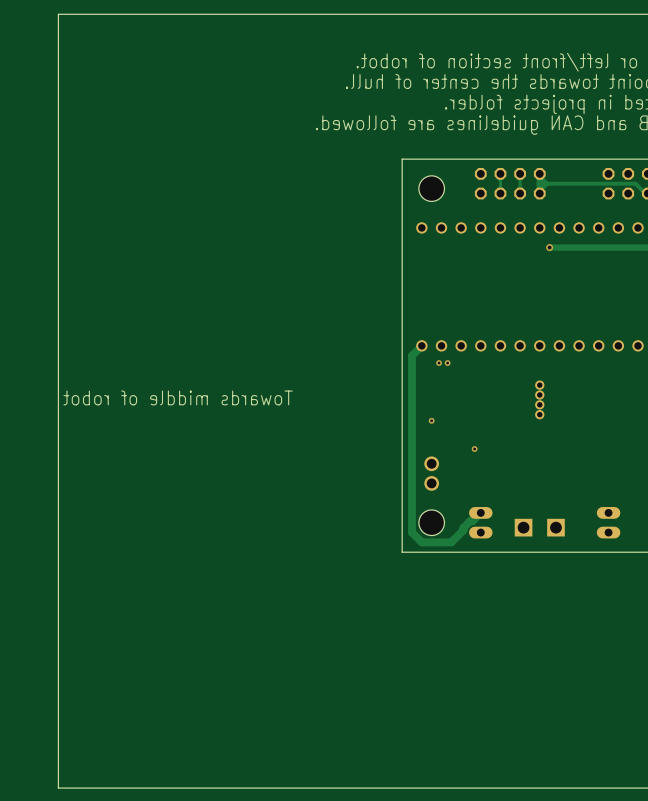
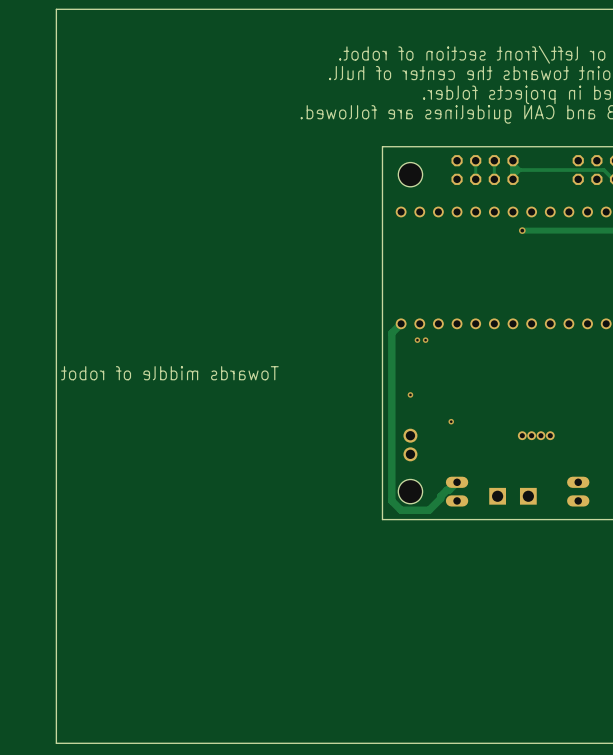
part rotation: 0° (539, 399) -> 90° clockwise (536, 435)
part position: (539, 399) -> (536, 435)

